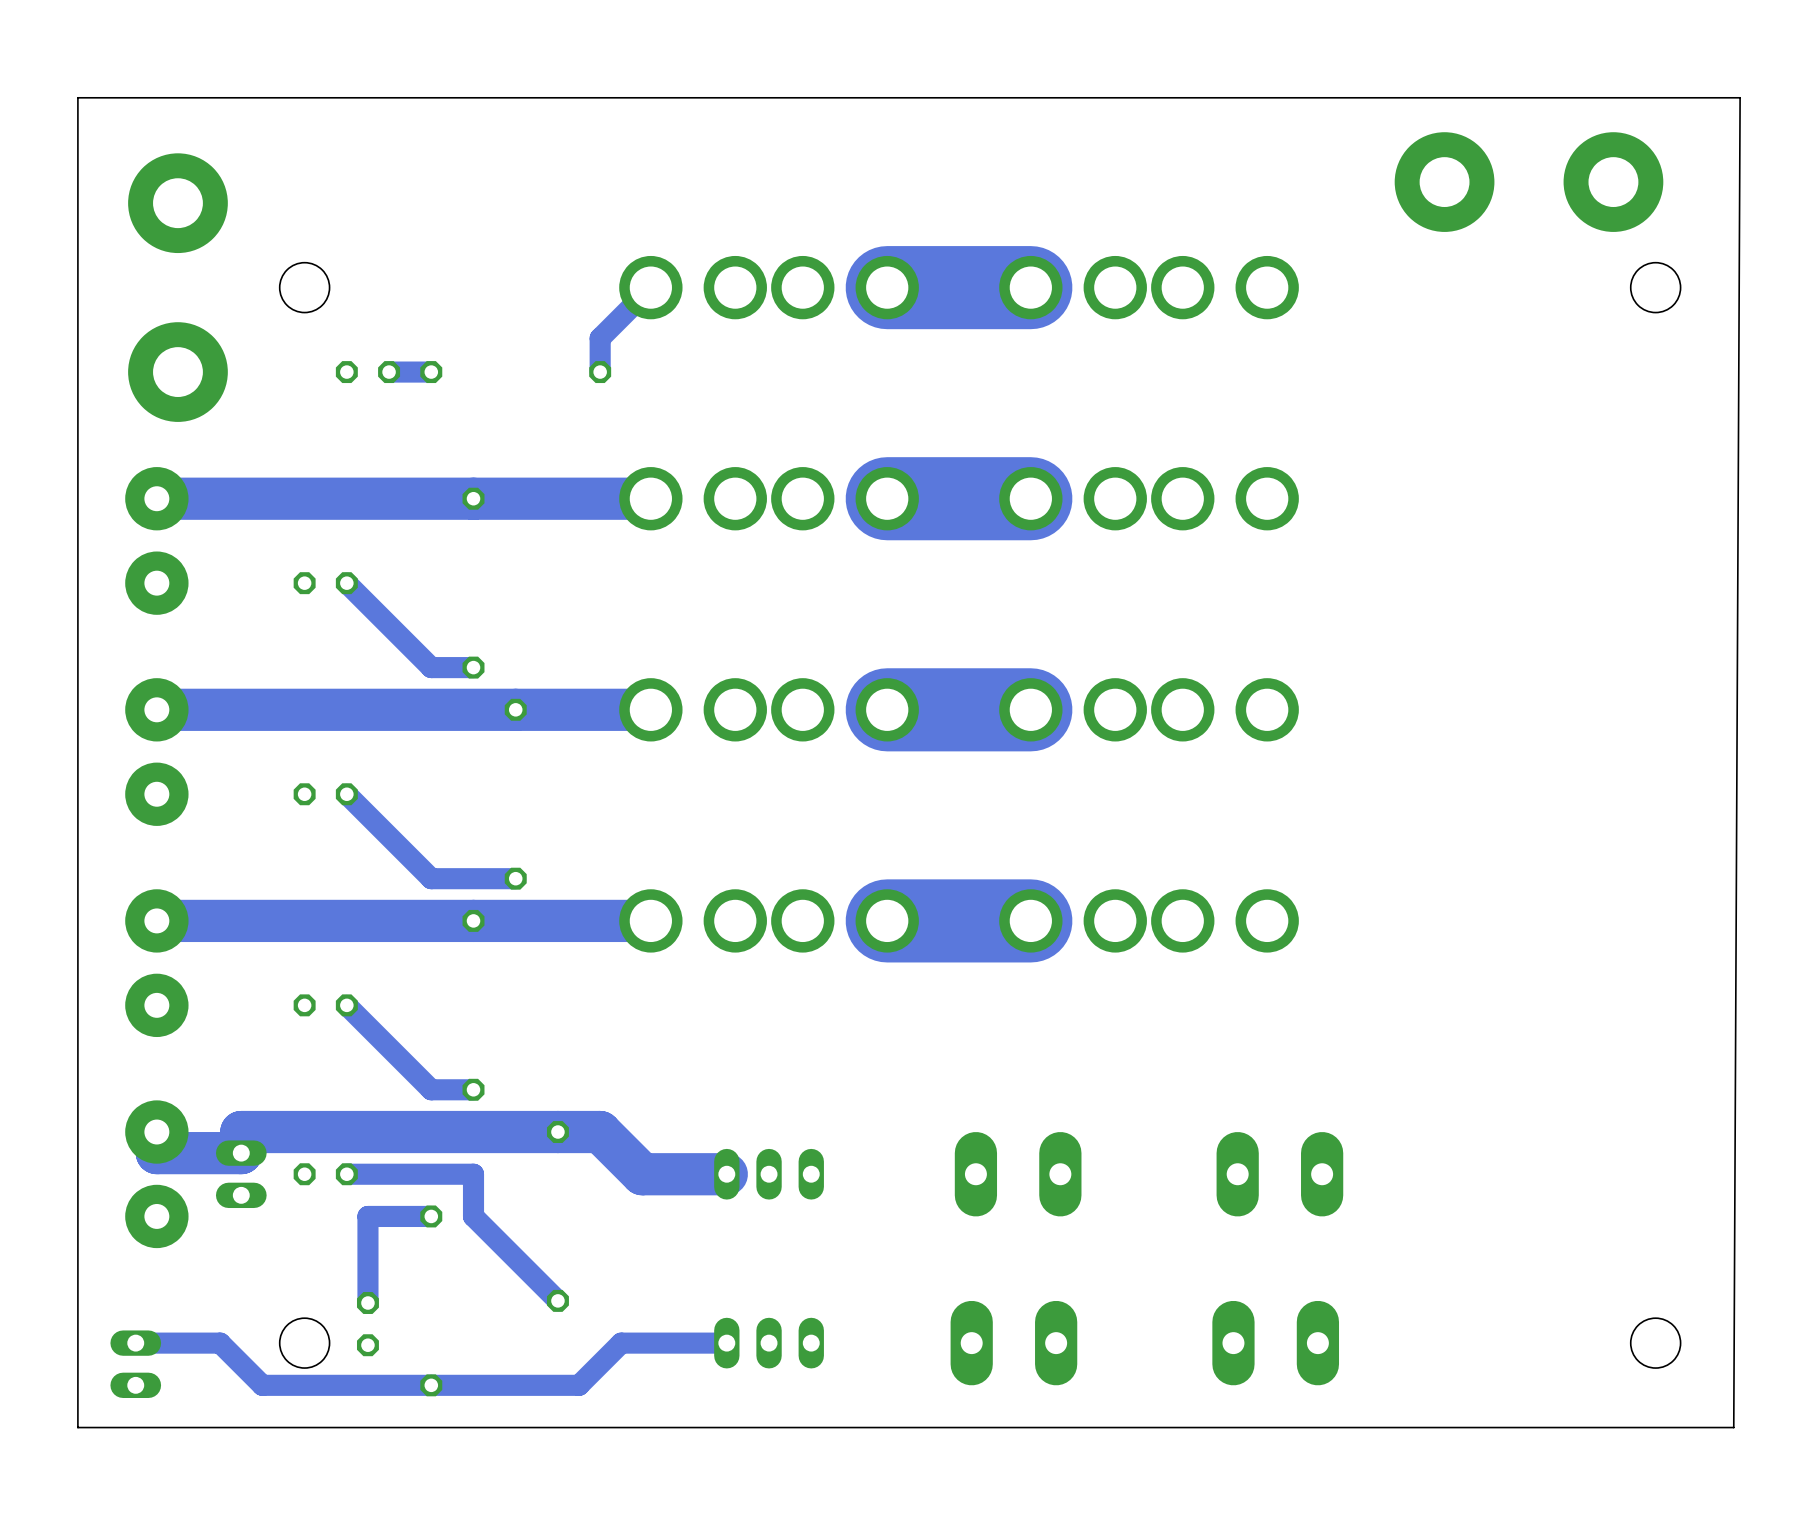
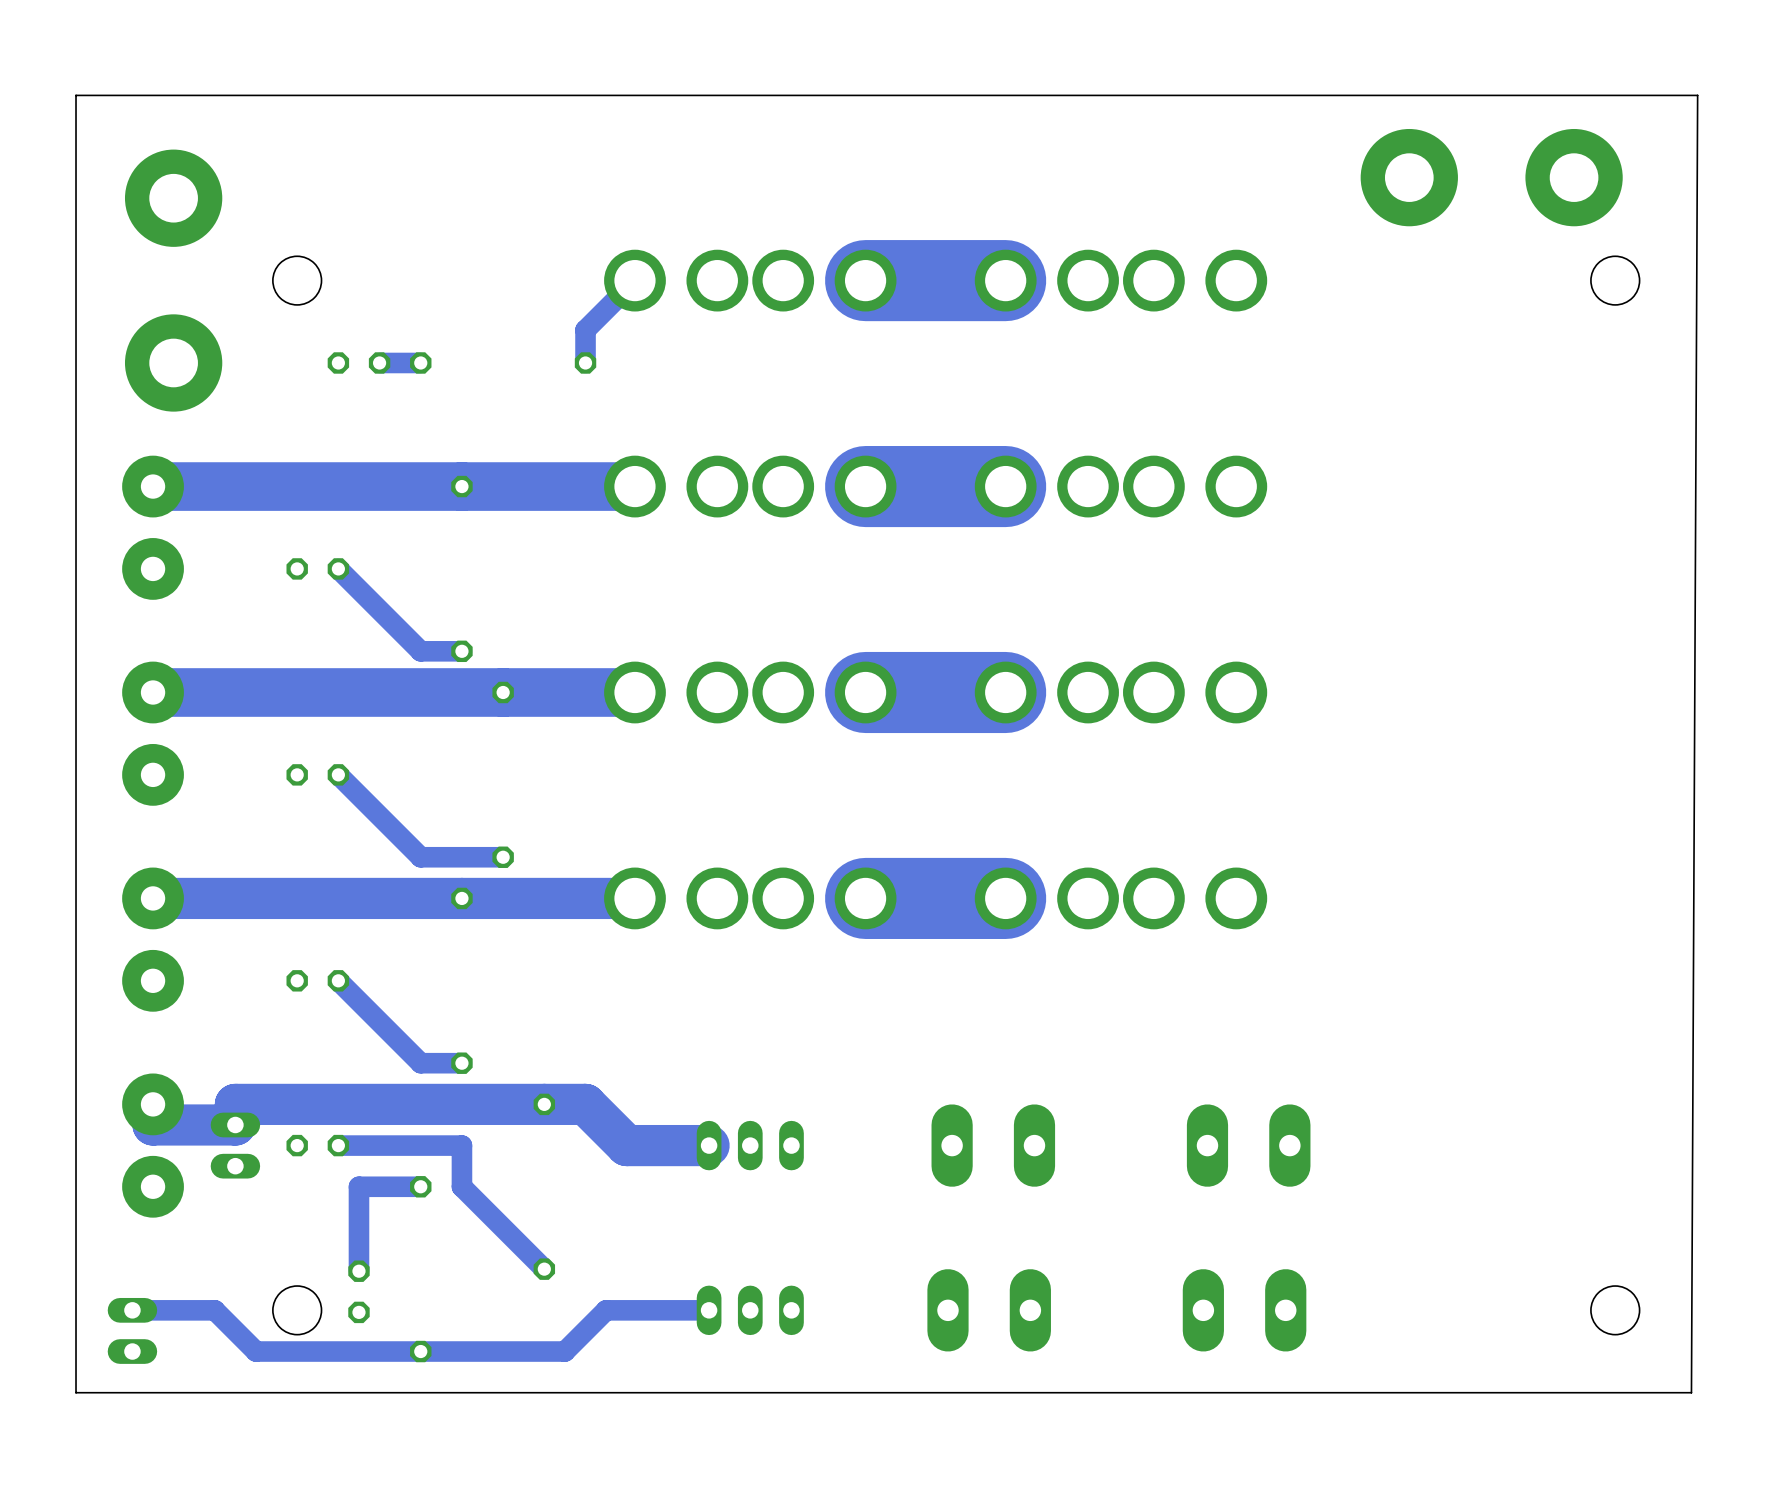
track width: thin (650, 498) (156, 498) -> thick (634, 486) (153, 486)
track width: thin (650, 709) (156, 709) -> thick (634, 692) (153, 692)

